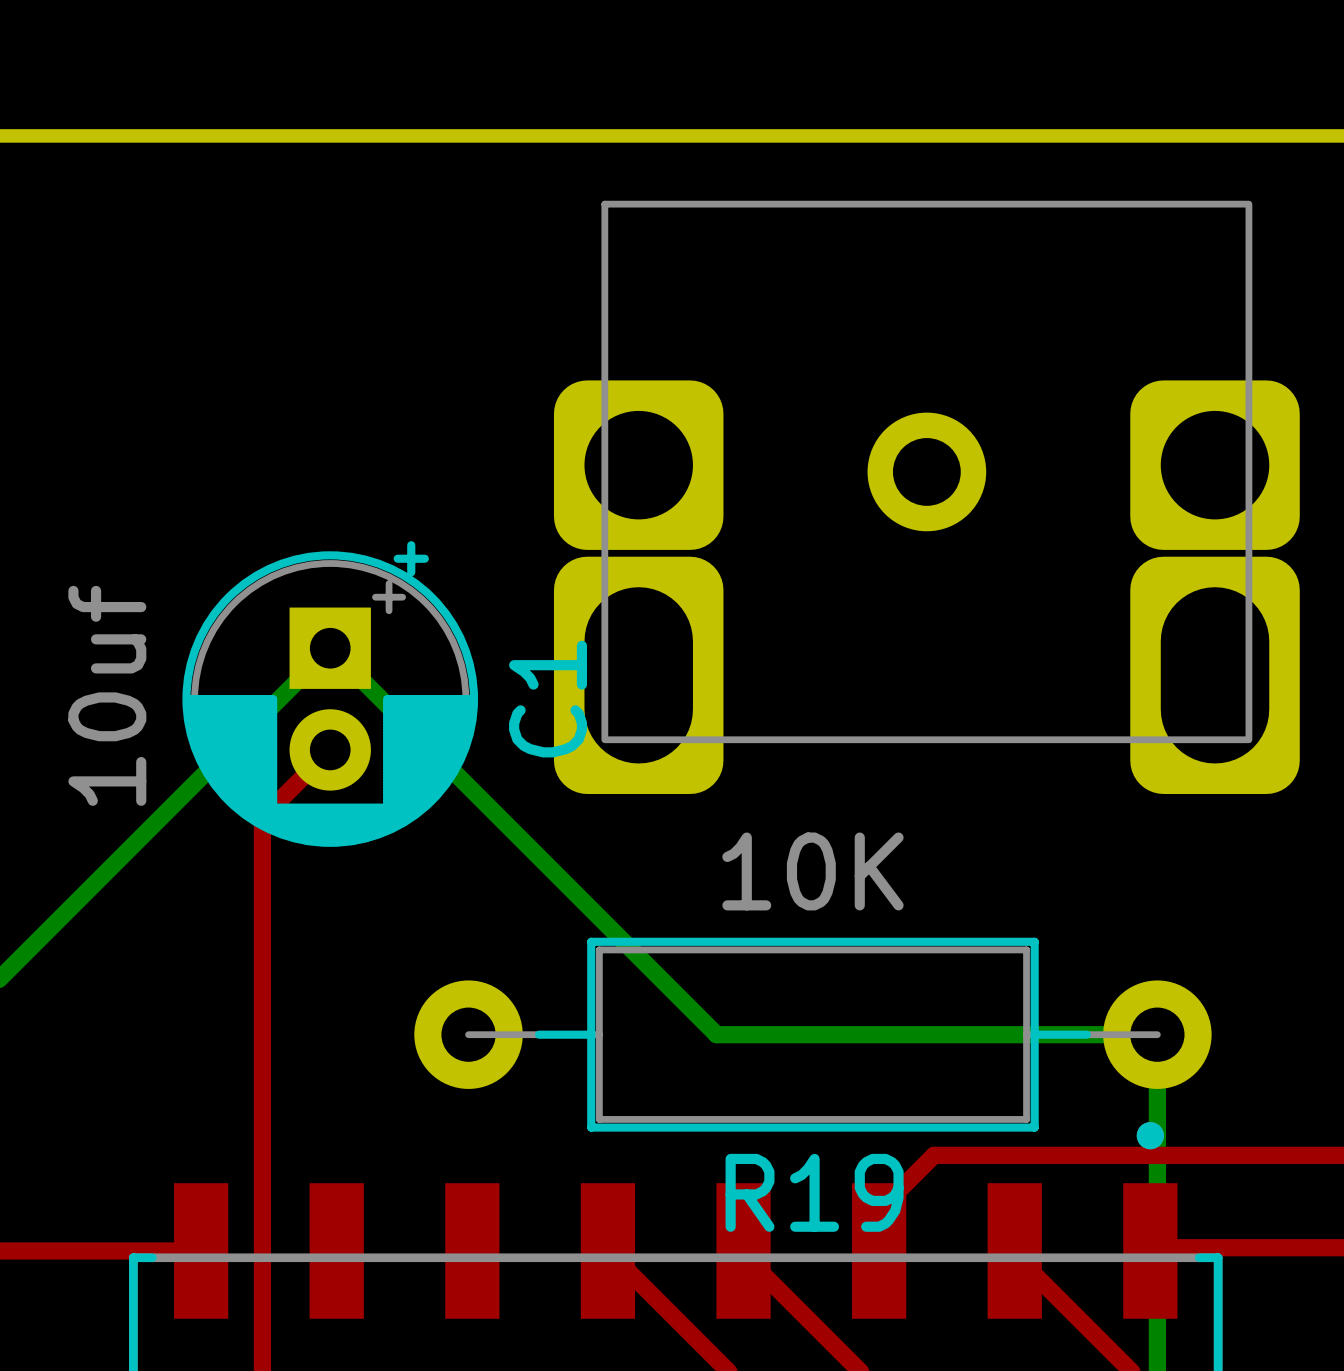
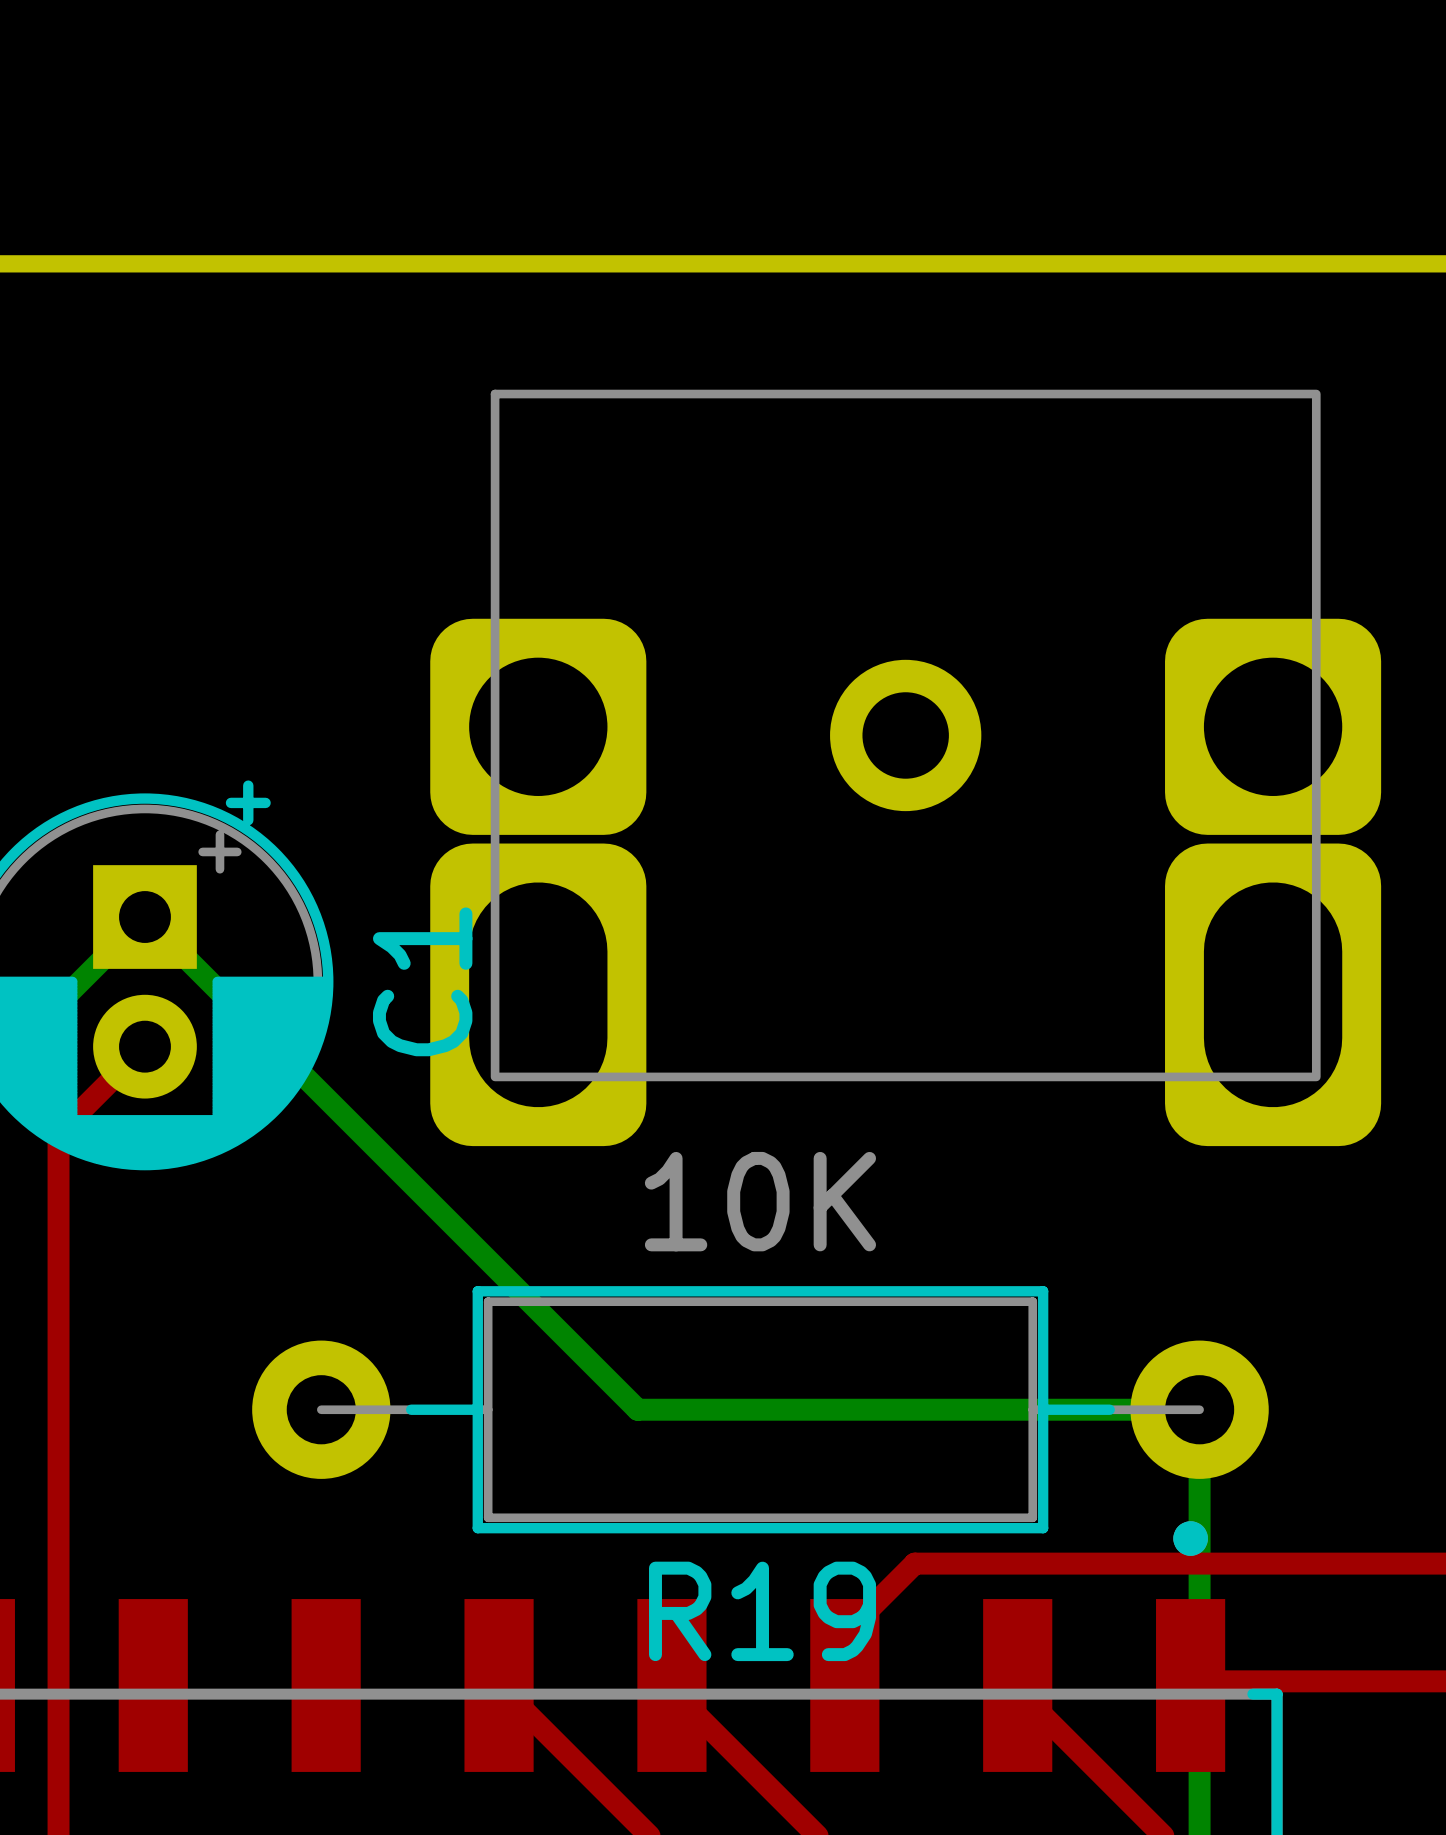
part position: (926, 497) -> (905, 767)

